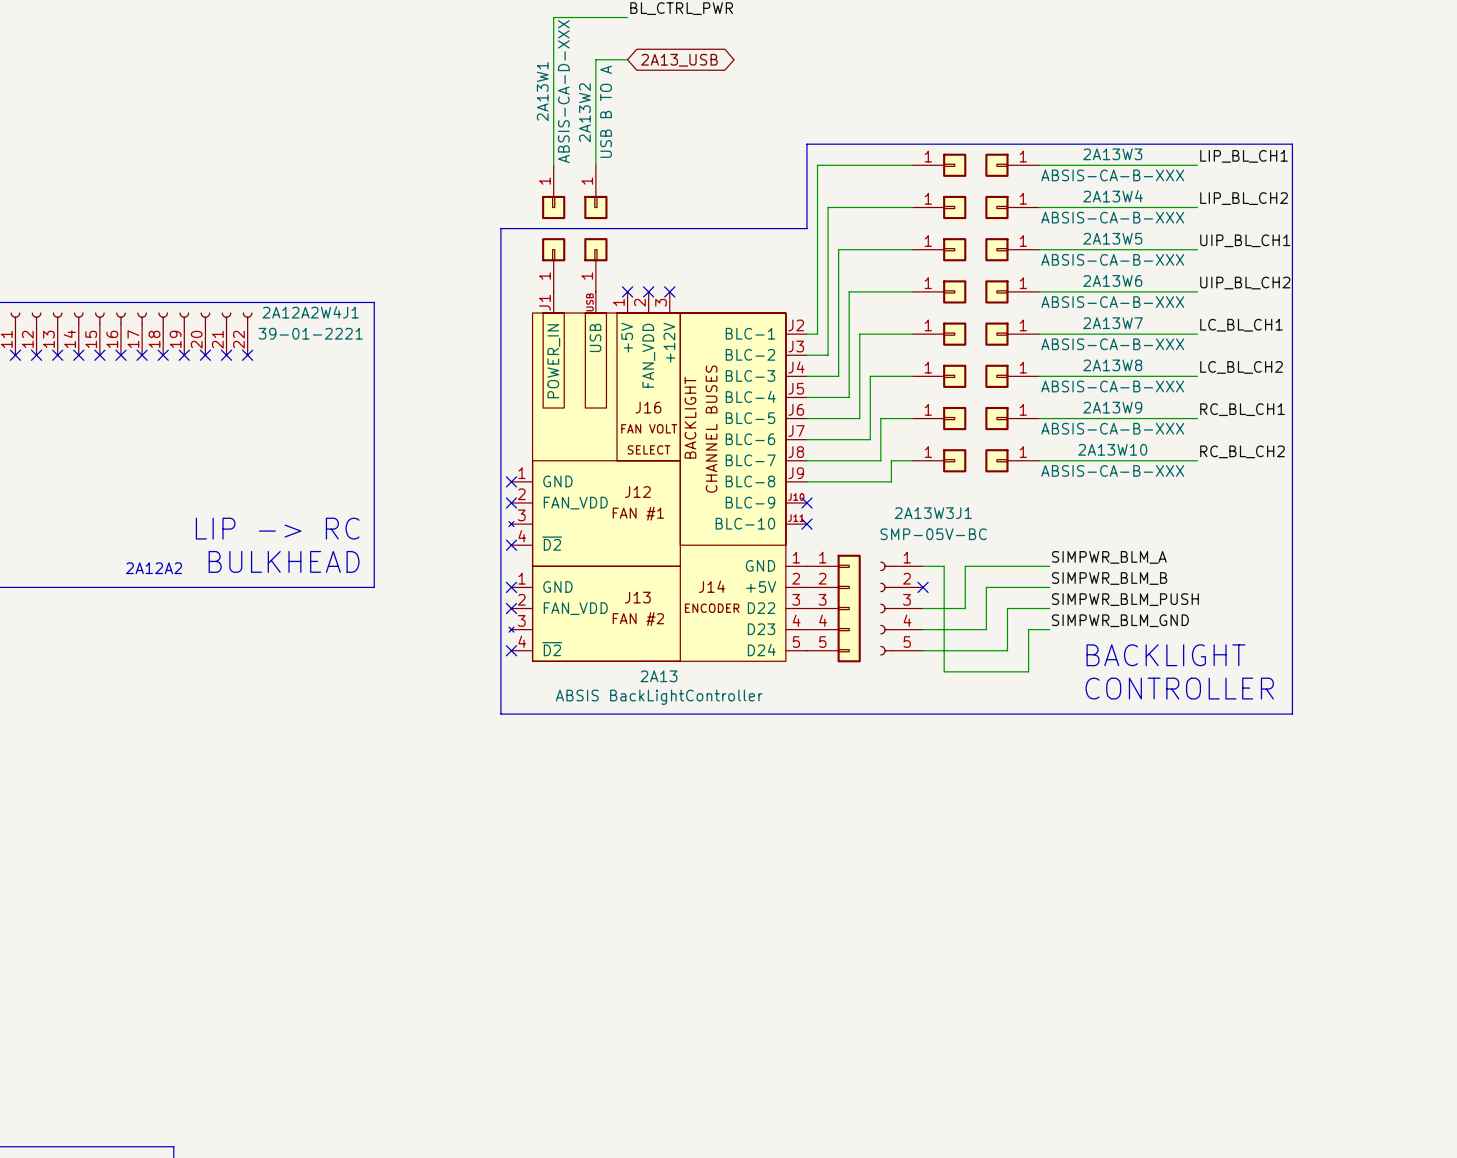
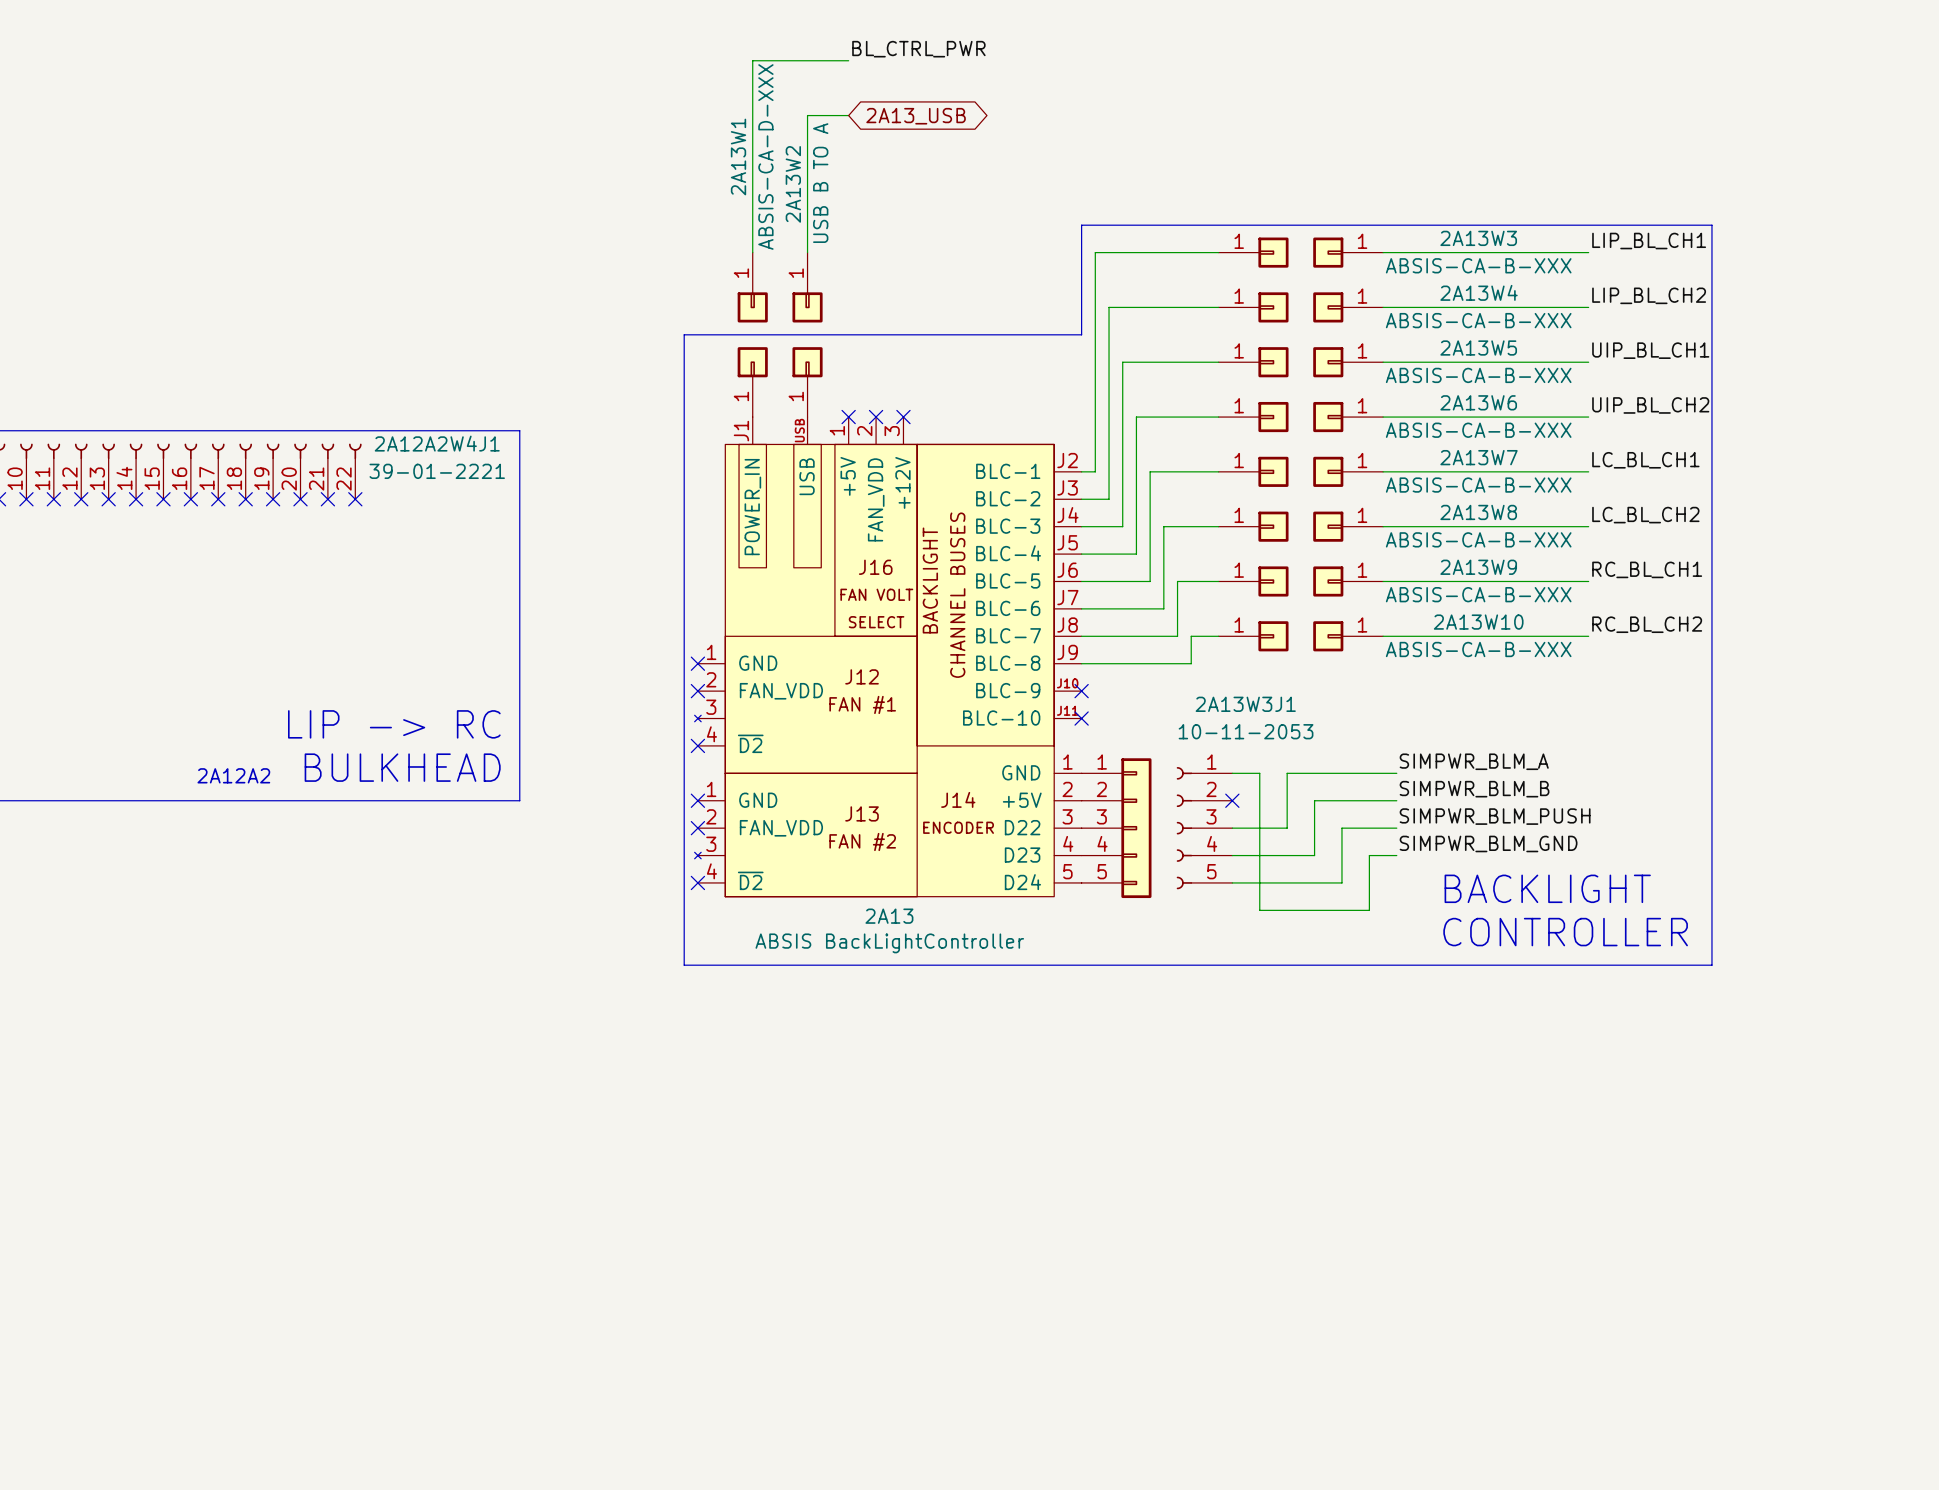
2A13W3J1 value: SMP-05V-BC (933, 534) -> 10-11-2053 (1246, 731)

